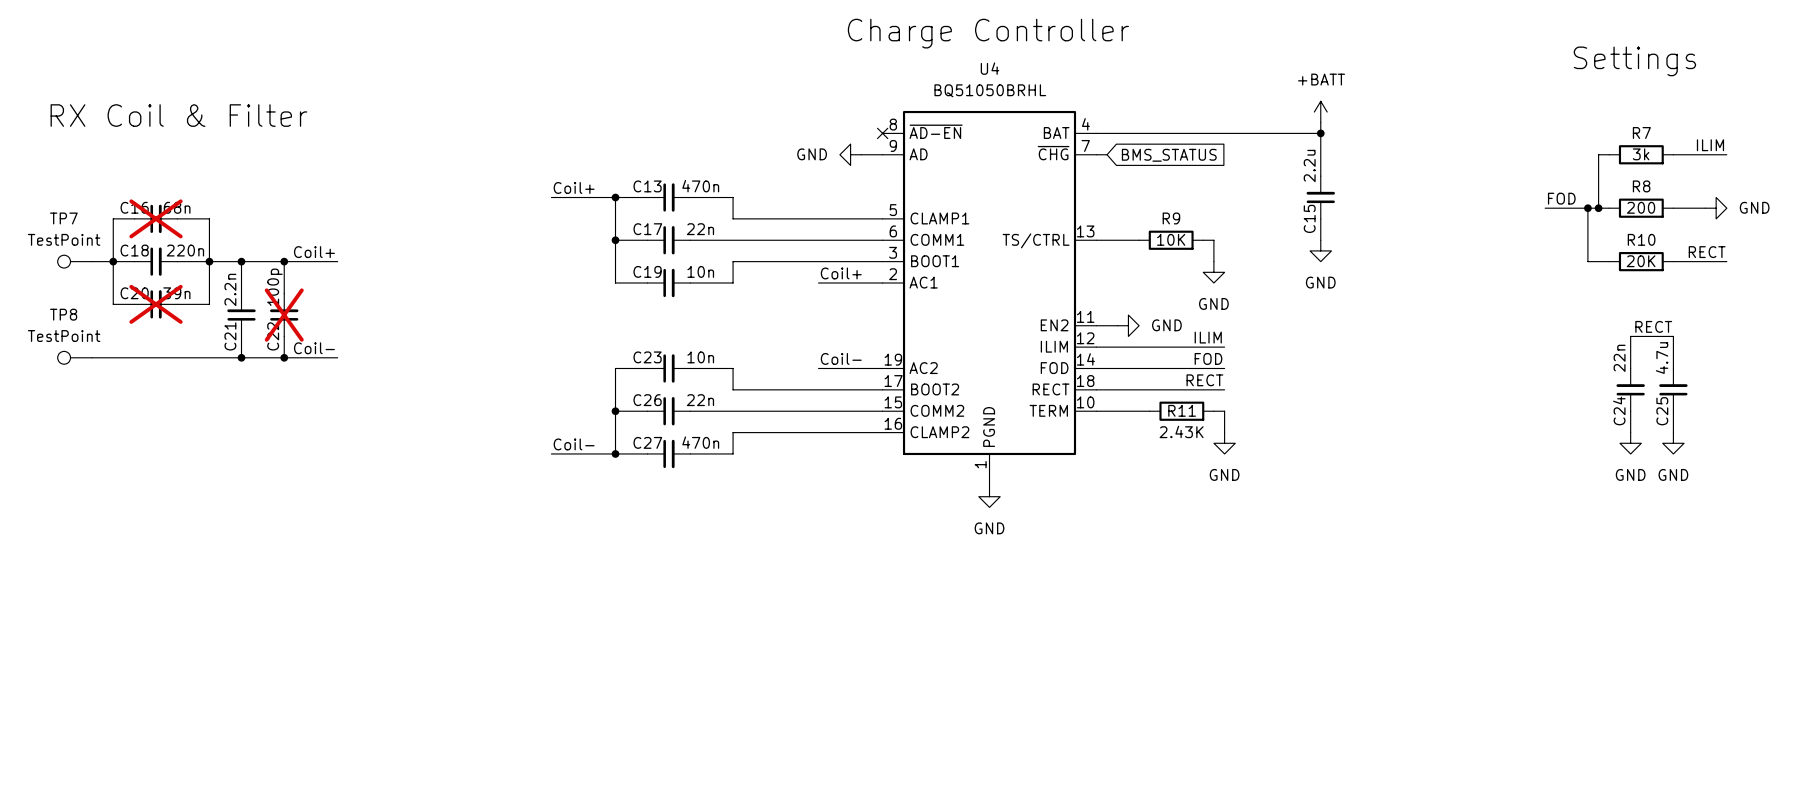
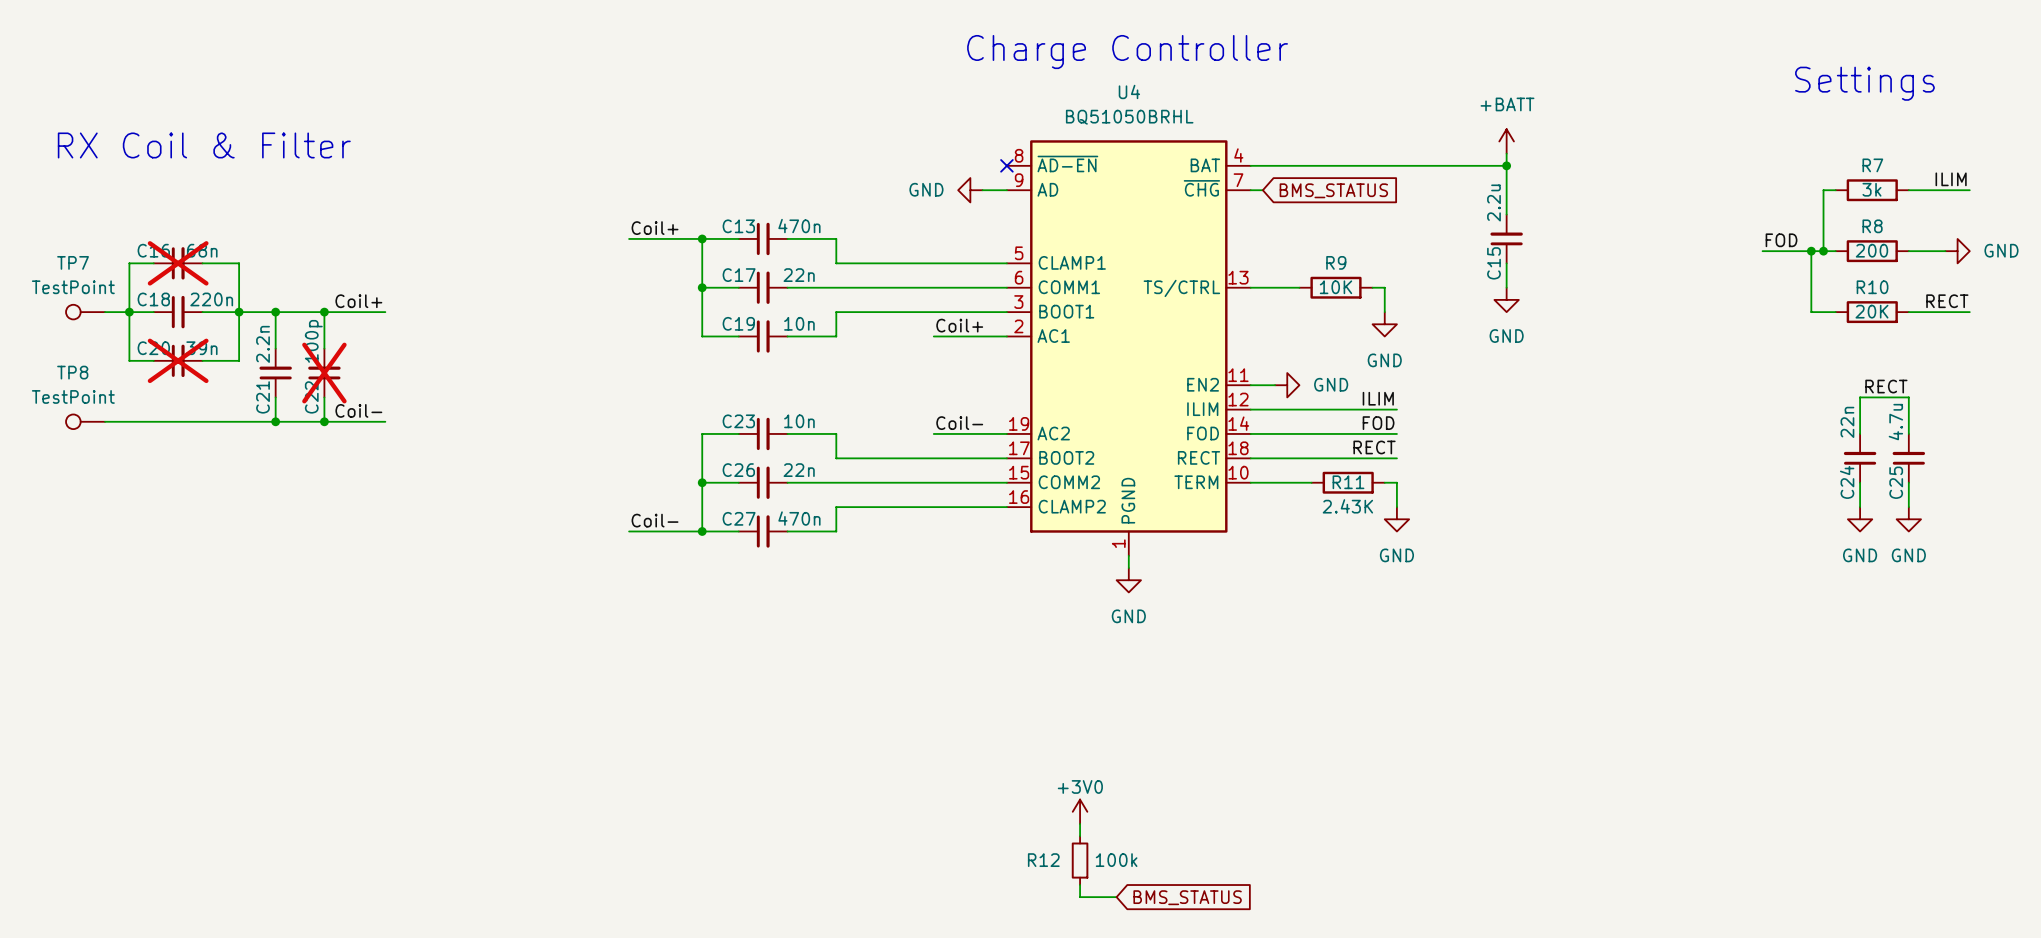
power symbol: none -> +3V0 (1080, 811)
wire: none -> (1080, 823) (1080, 836)
R12: none -> 100k (1080, 860)
wire: none -> (1080, 884) (1080, 897) (1116, 897)
global label: none -> BMS_STATUS (1187, 897)

